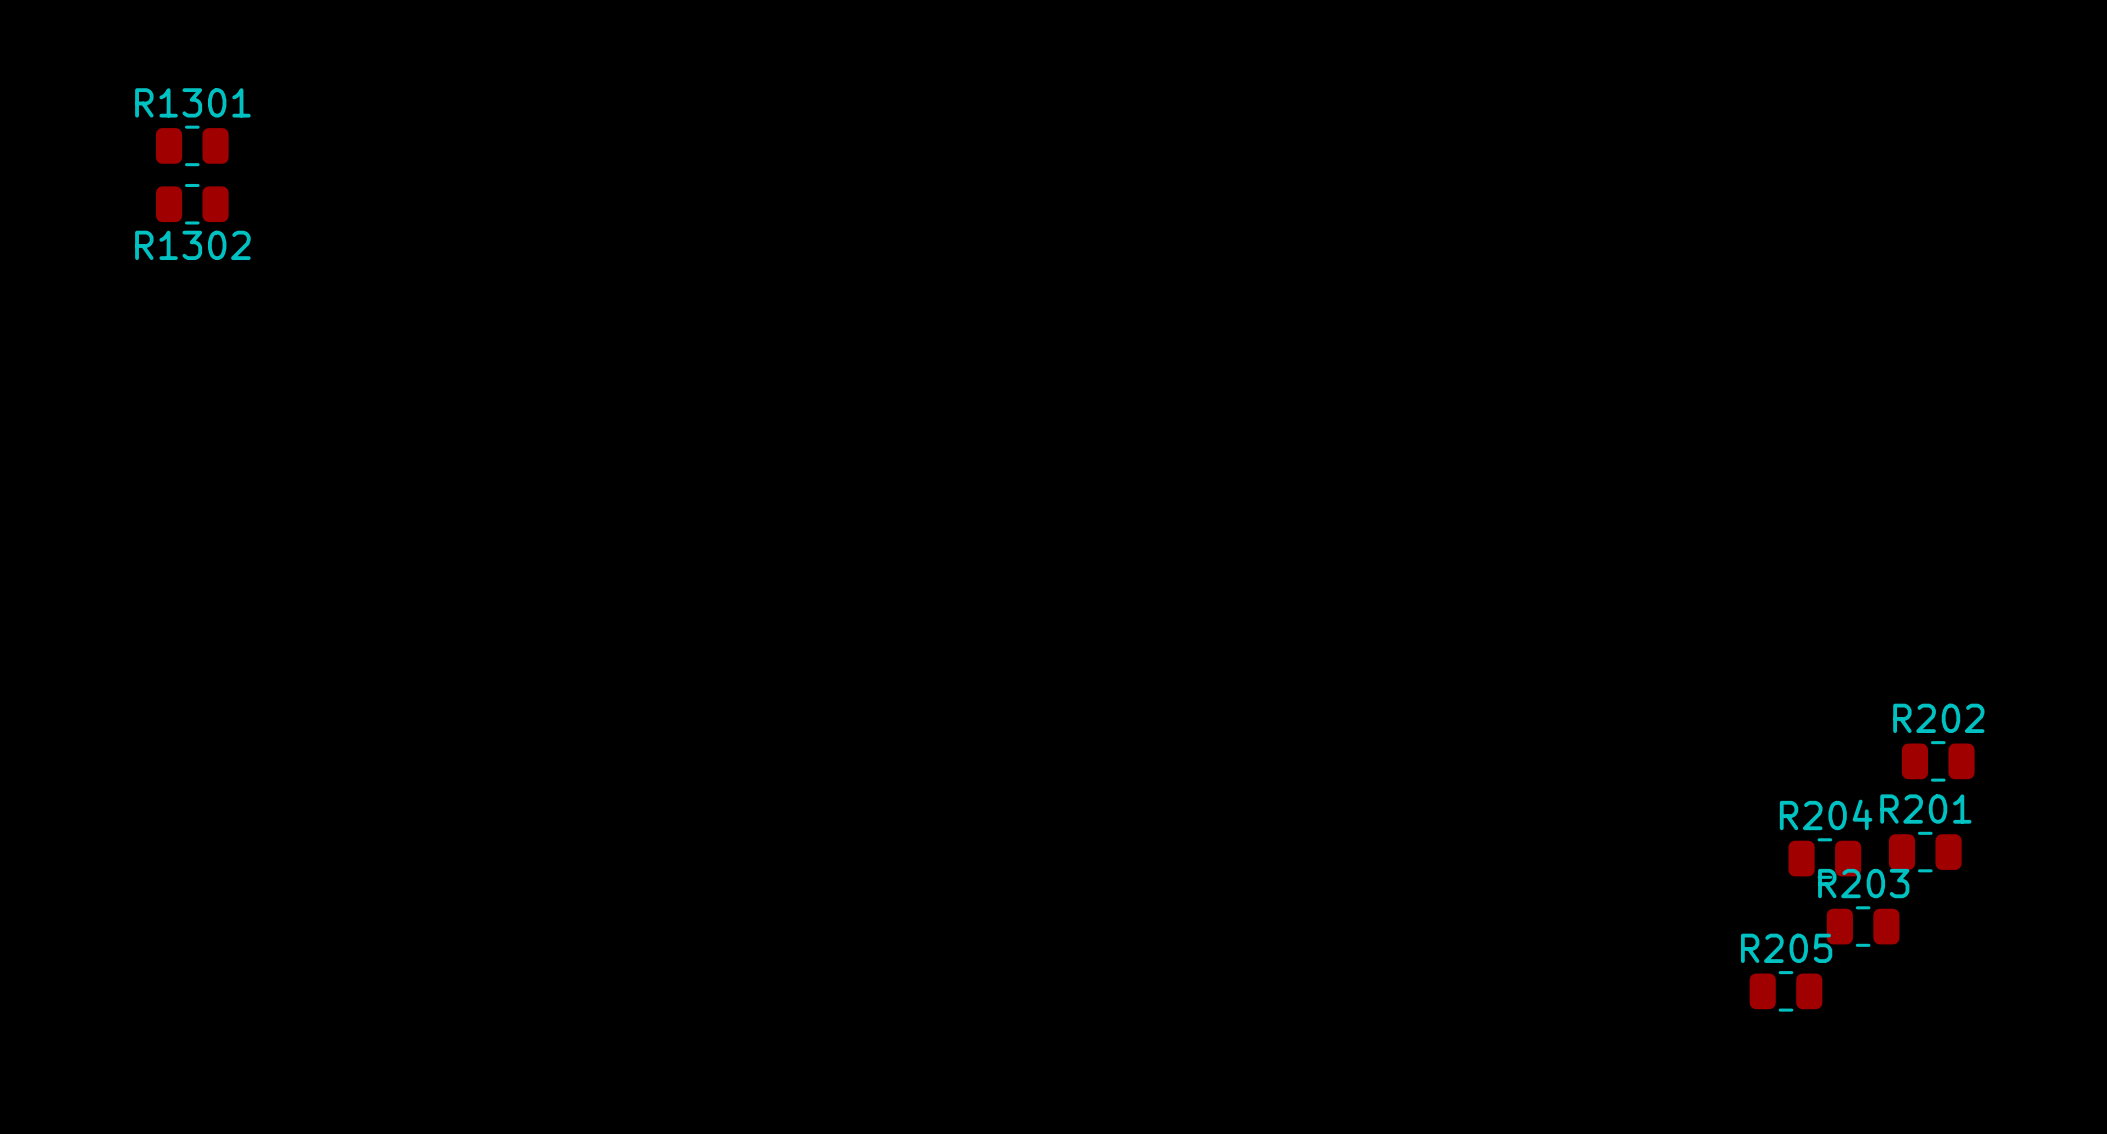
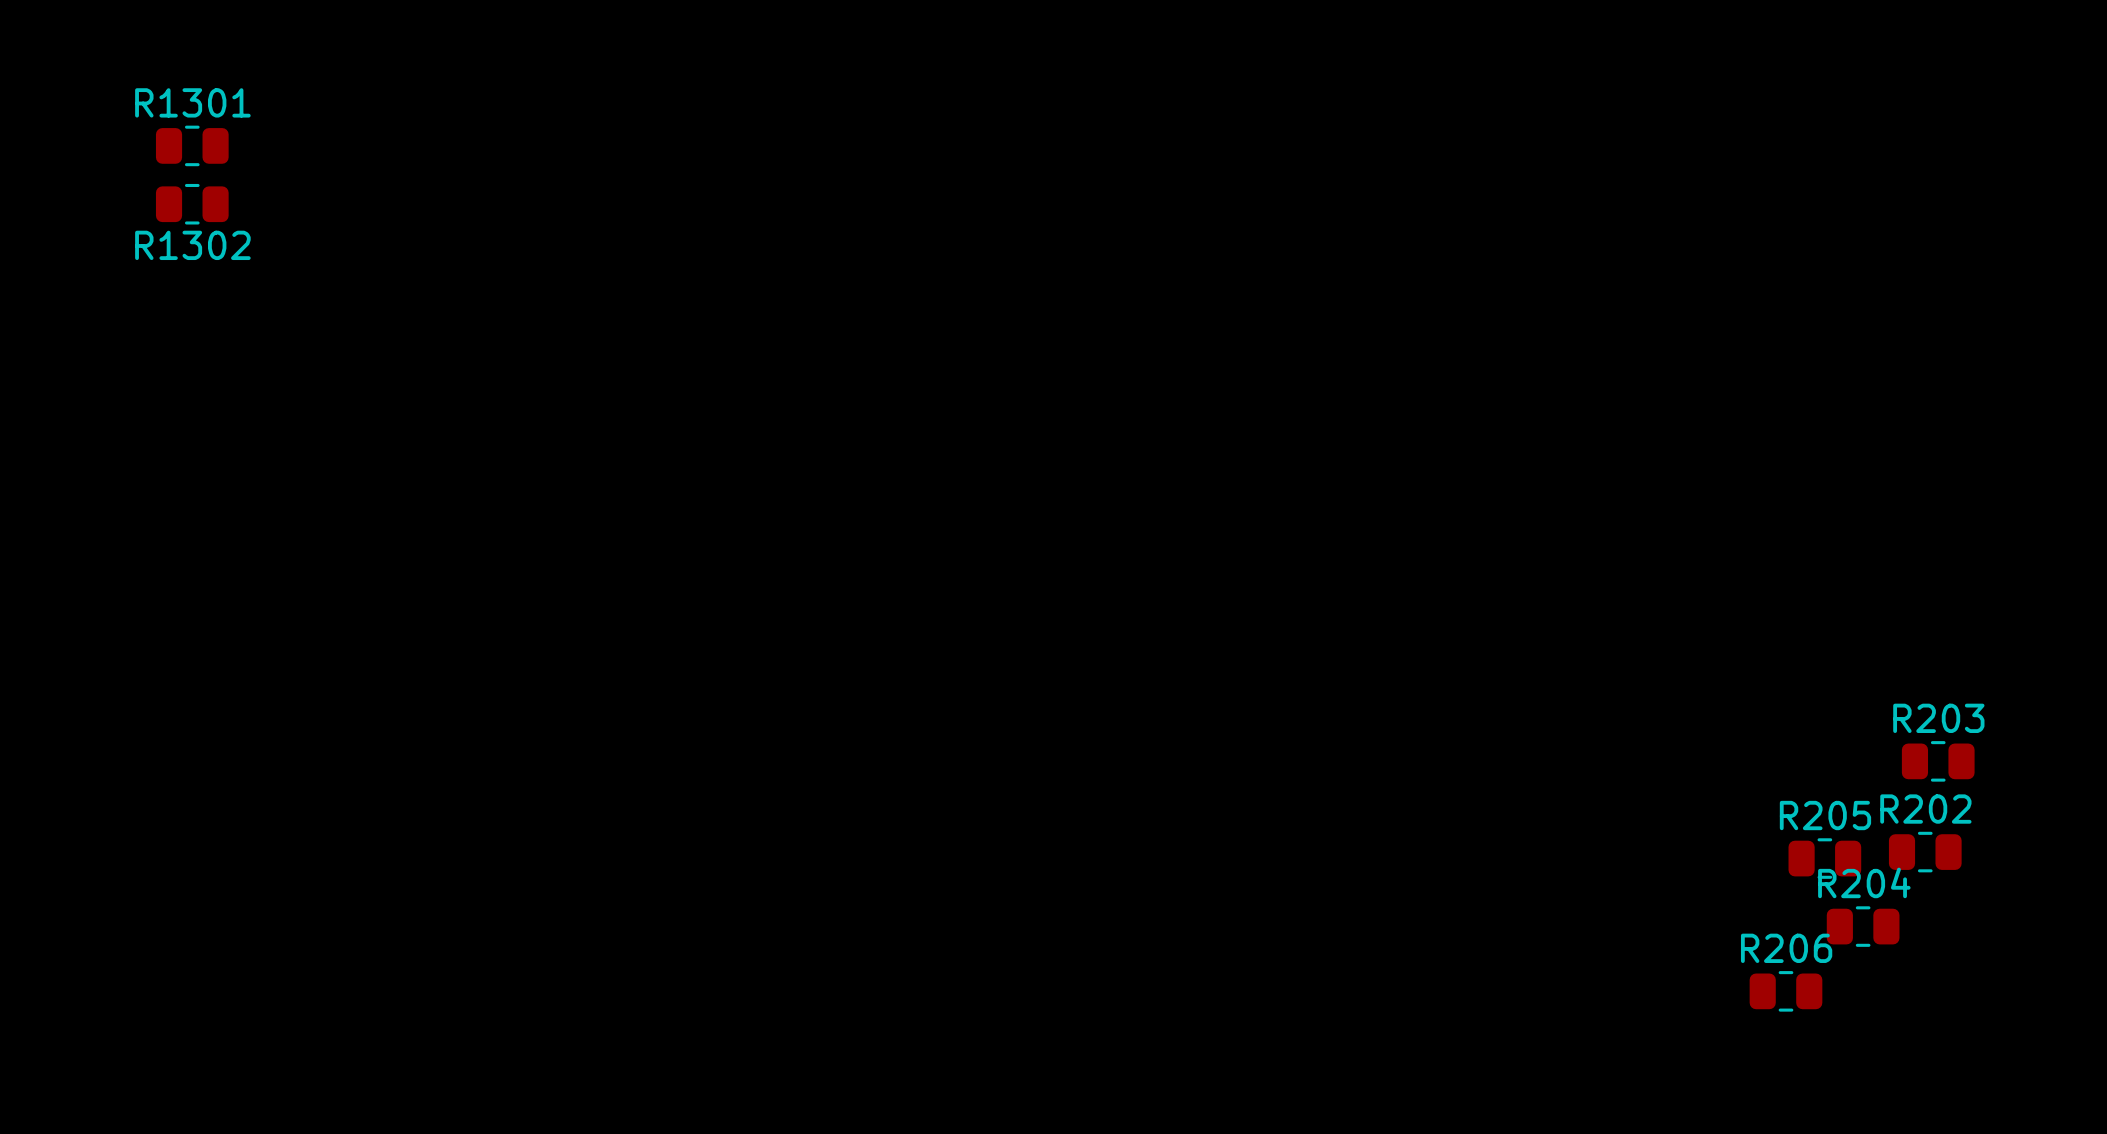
R202 name: R202 (1938, 718) -> R203 (1938, 718)
R201 name: R201 (1925, 809) -> R202 (1925, 809)
R204 name: R204 (1826, 814) -> R205 (1825, 815)
R203 name: R203 (1863, 883) -> R204 (1864, 882)
R205 name: R205 (1786, 948) -> R206 (1786, 948)

